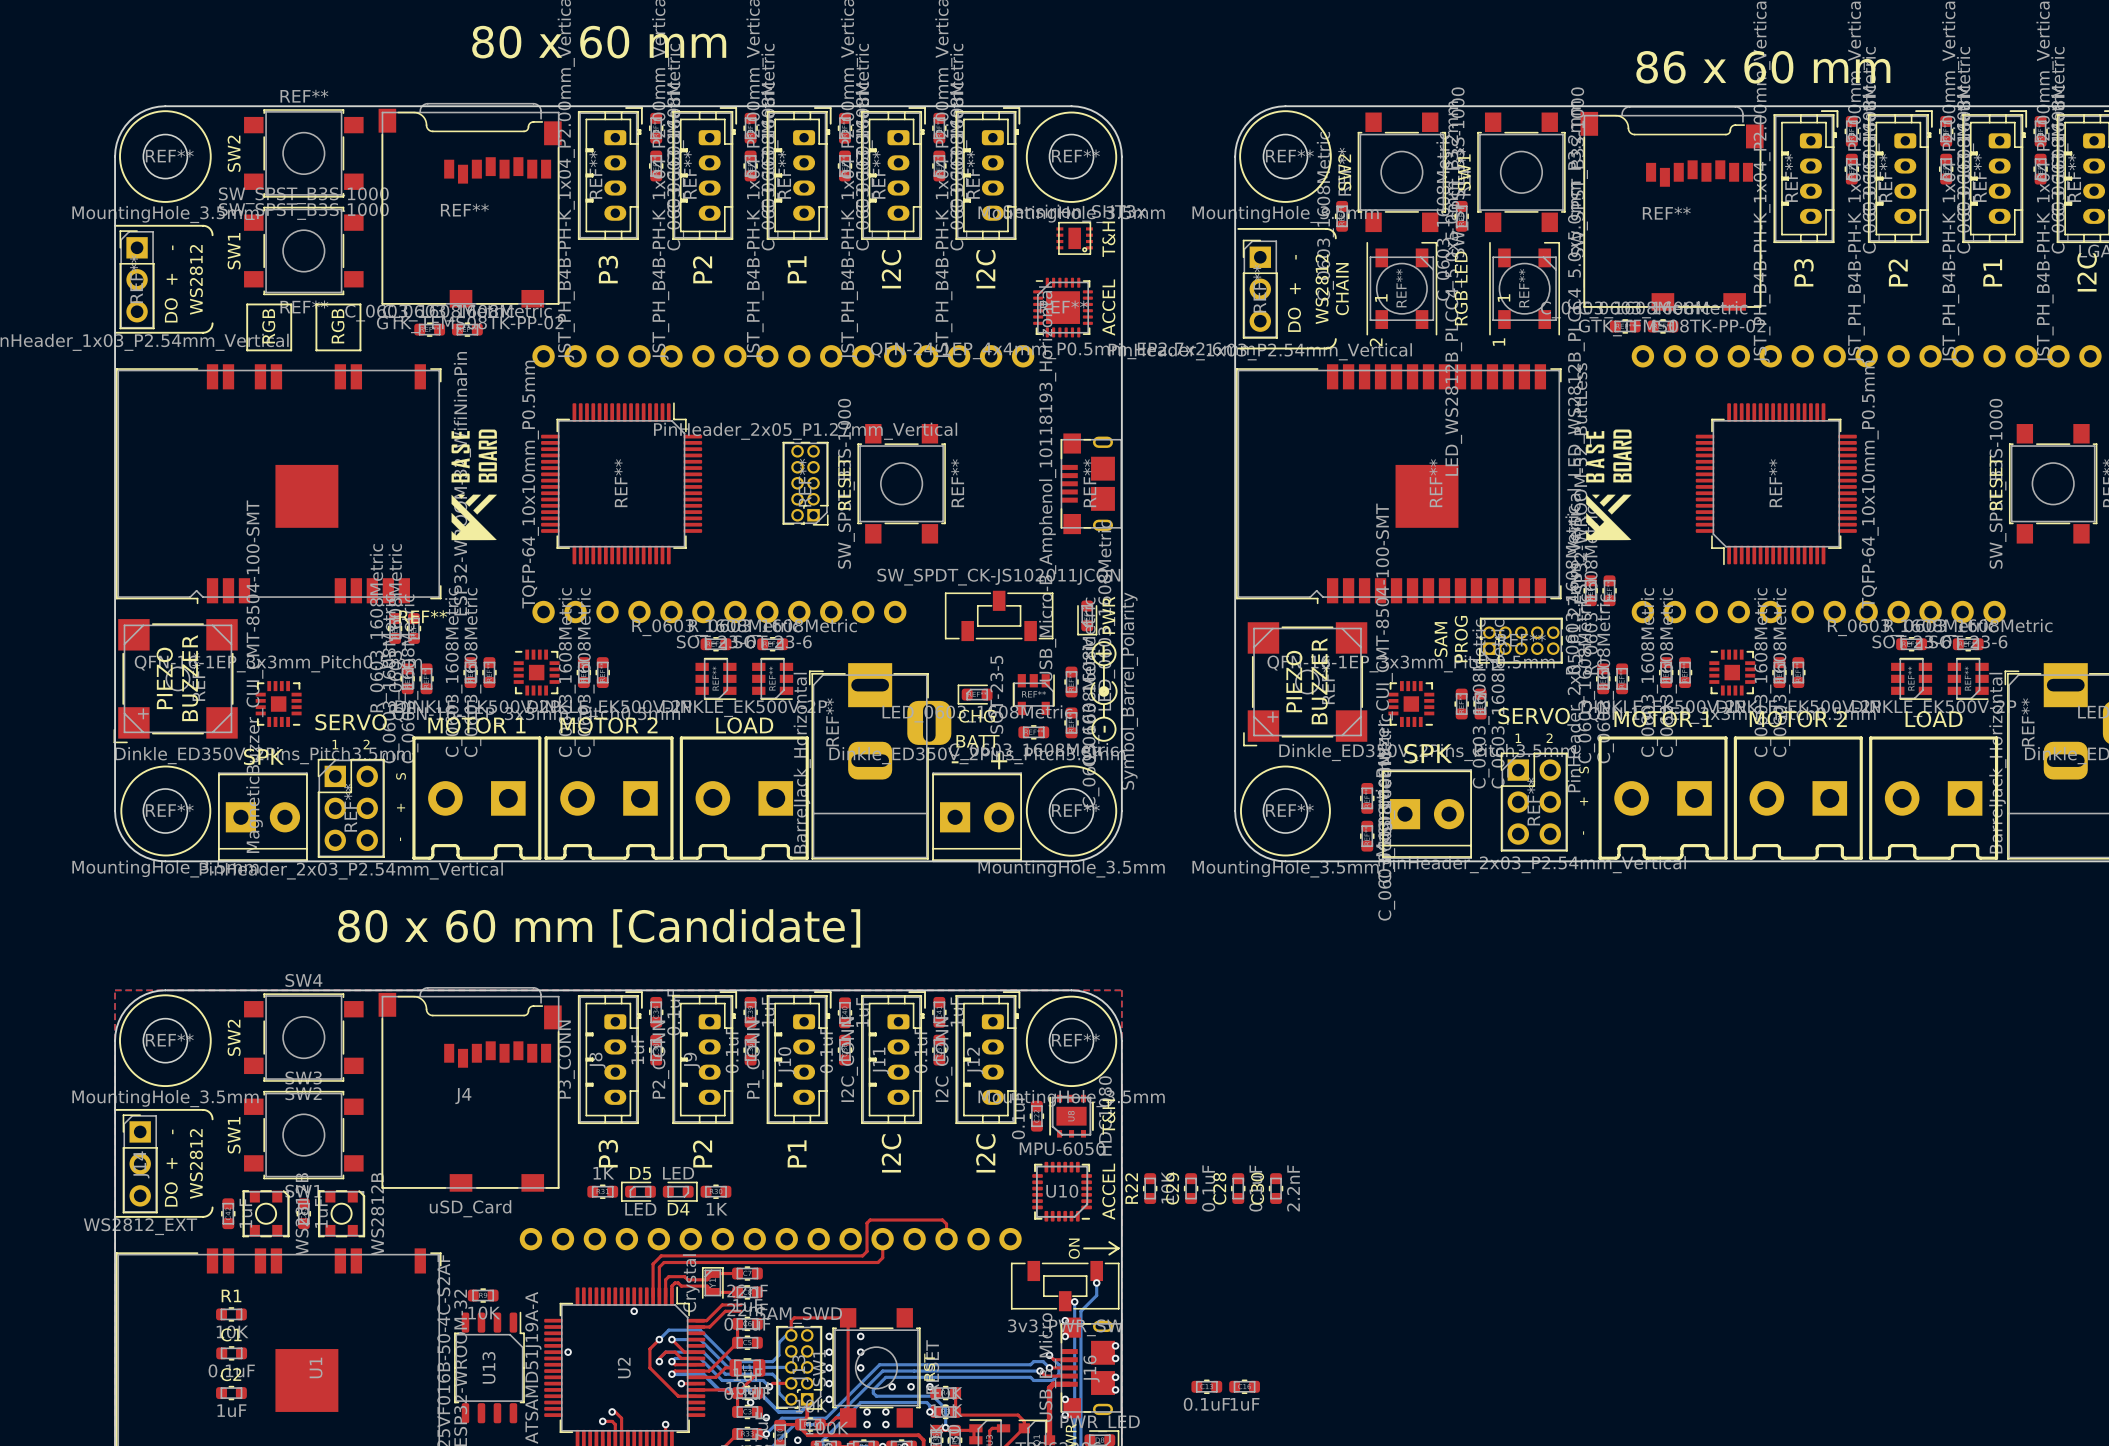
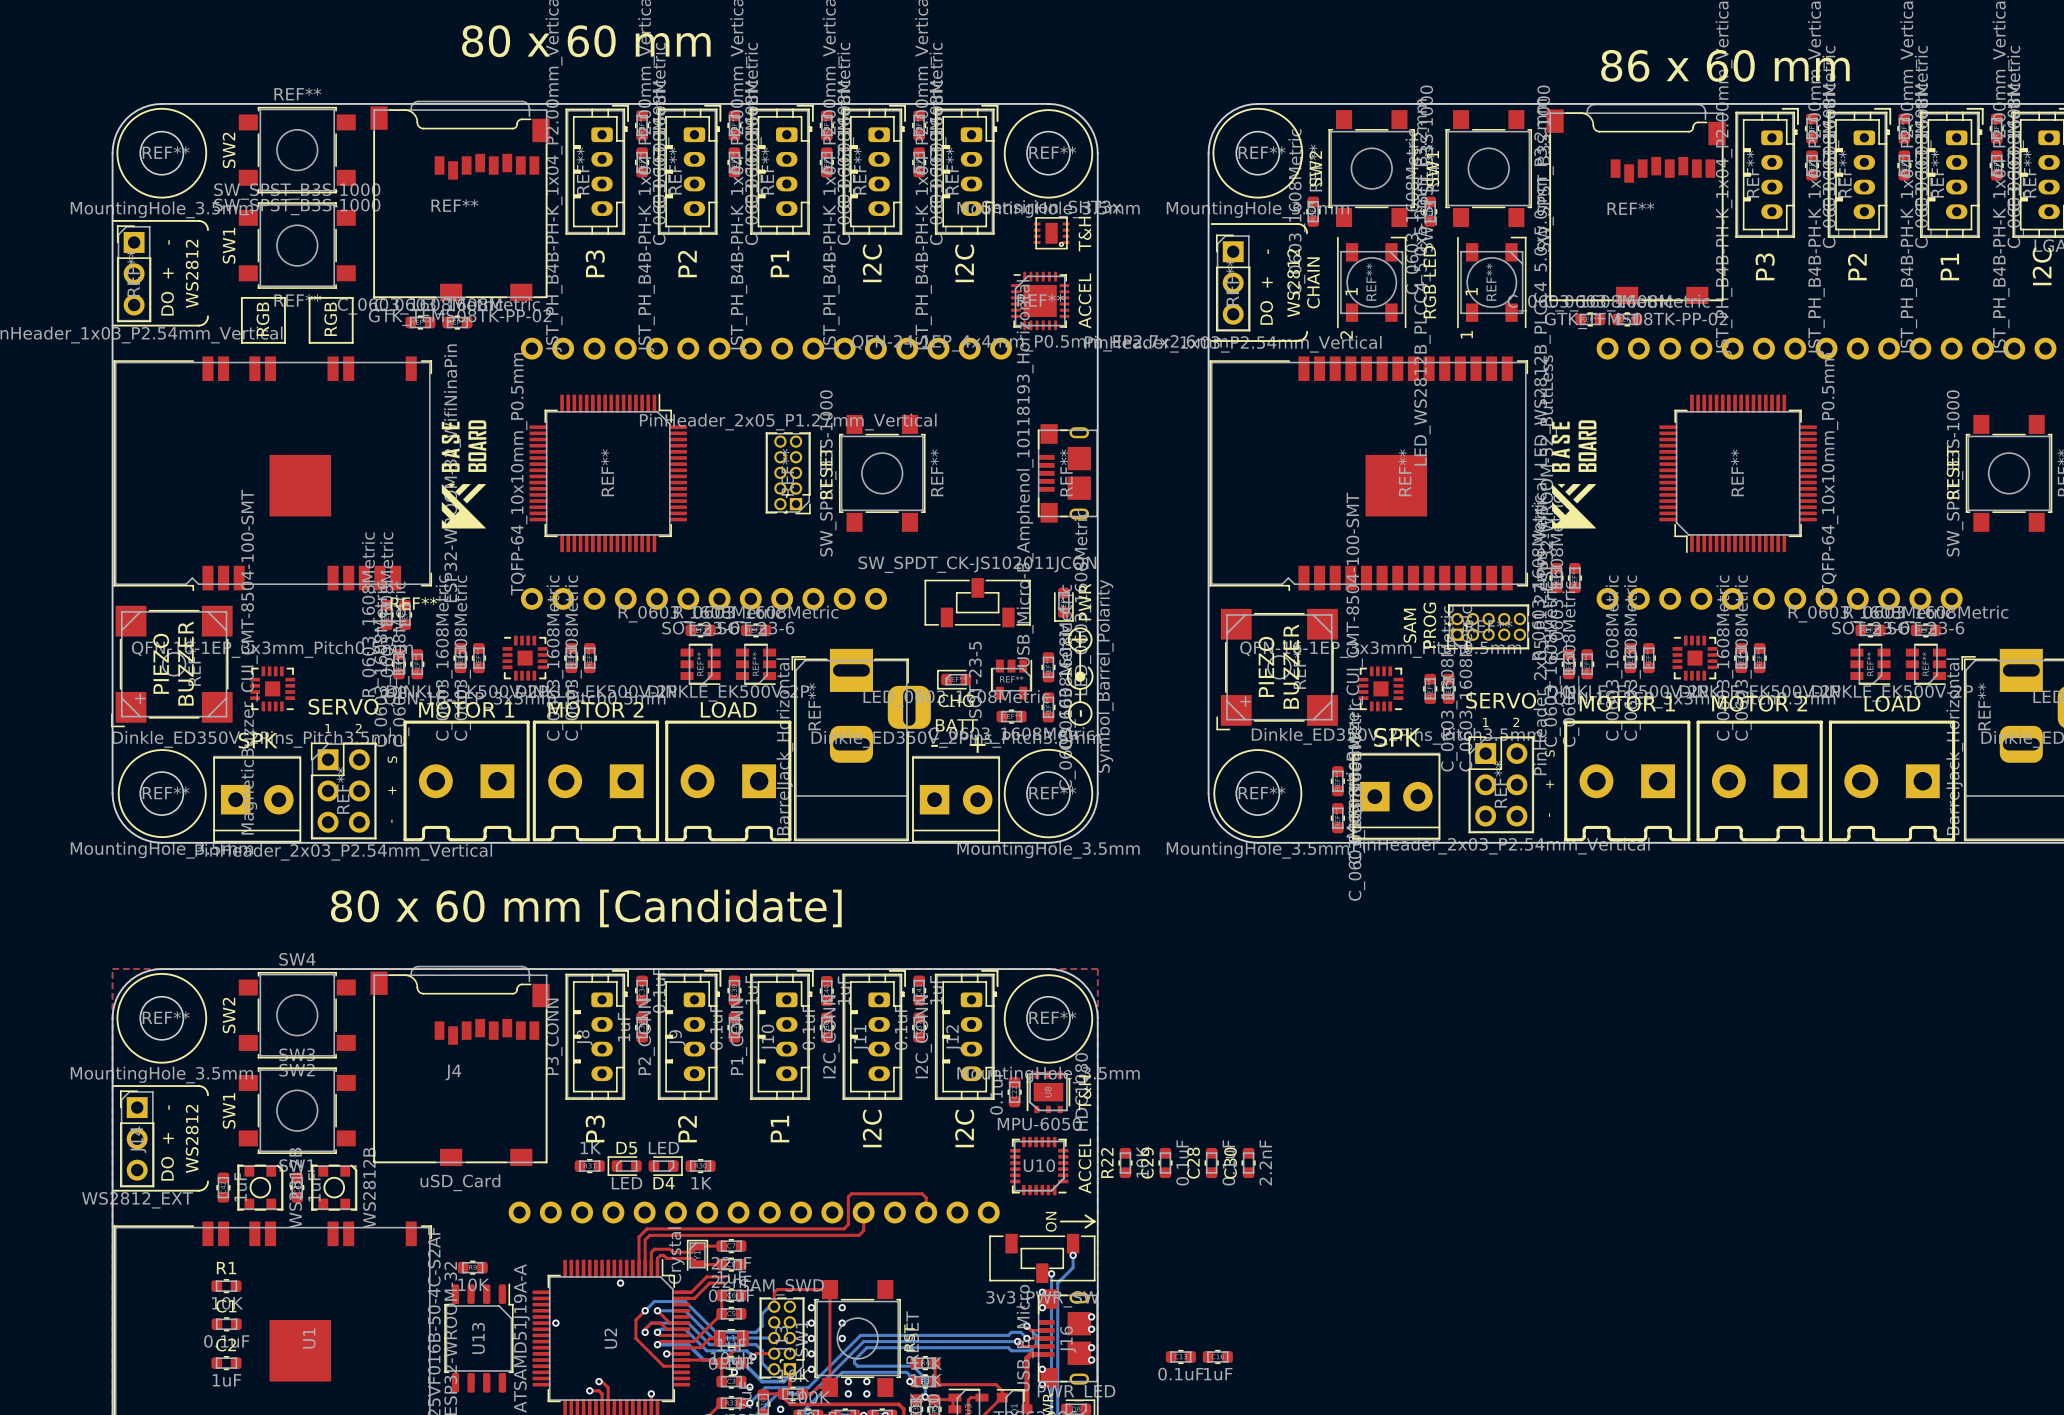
via: (892, 1386) -> none
via: (911, 1386) -> none
via: (929, 1386) -> none

